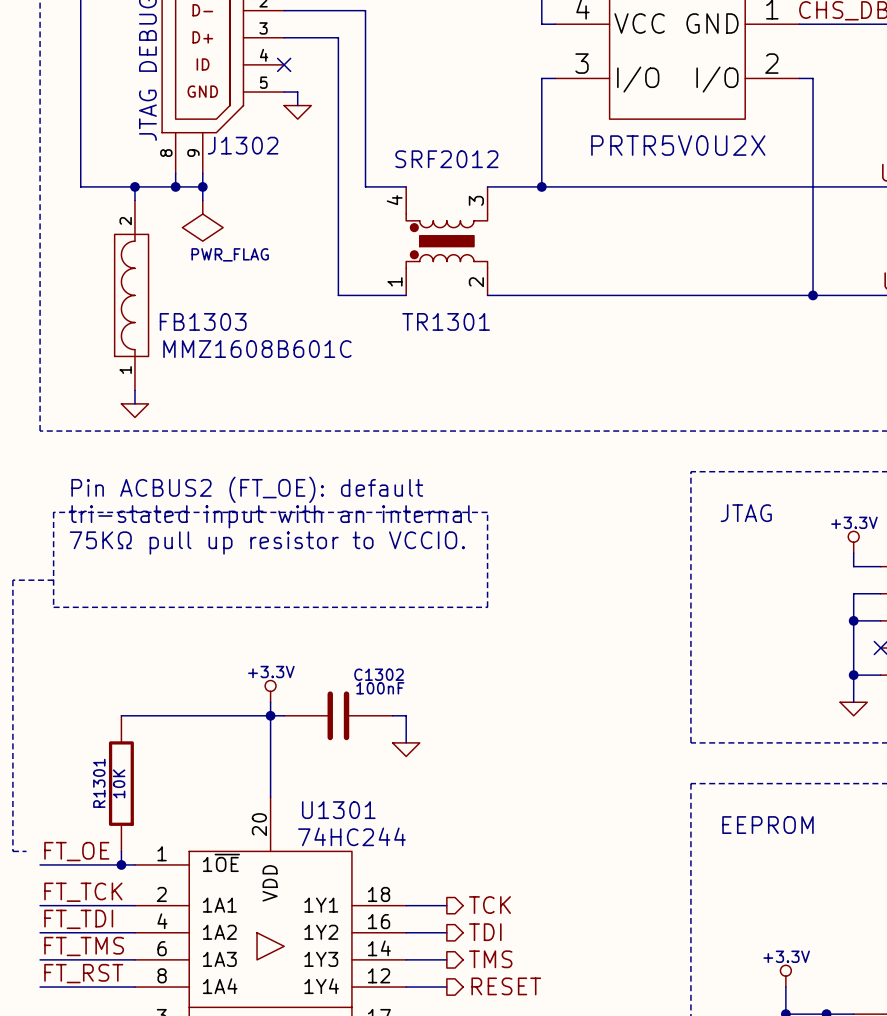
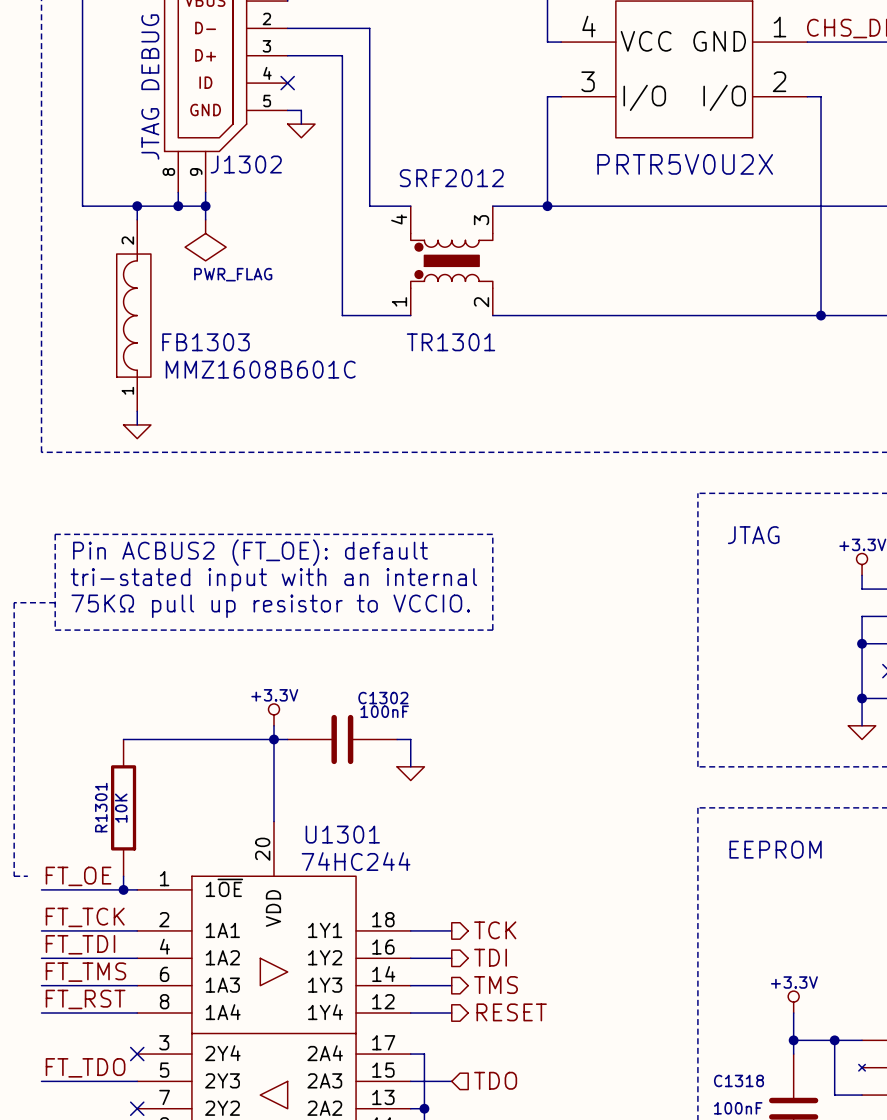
text position: Pin ACBUS2 (FT_OE): default (247, 489) -> Pin ACBUS2 (FT_OE): default (250, 552)
text position: tri-stated input with an internal (270, 516) -> tri-stated input with an internal (273, 579)
text position: 75KΩ pull up resistor to VCCIO. (267, 542) -> 75KΩ pull up resistor to VCCIO. (270, 606)

